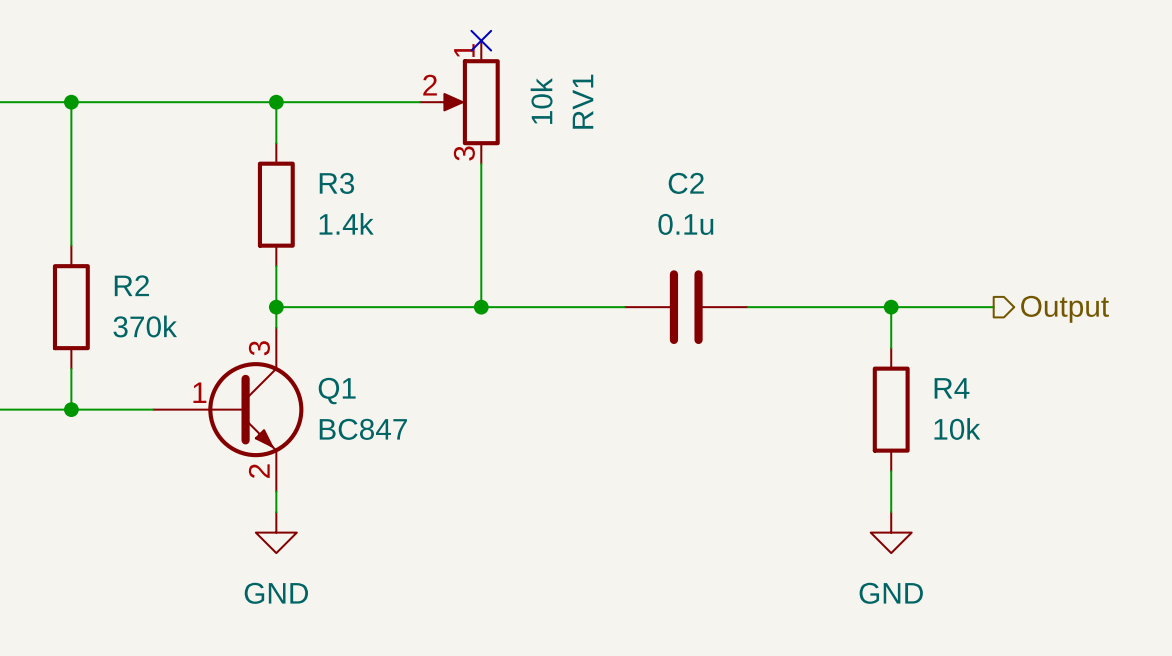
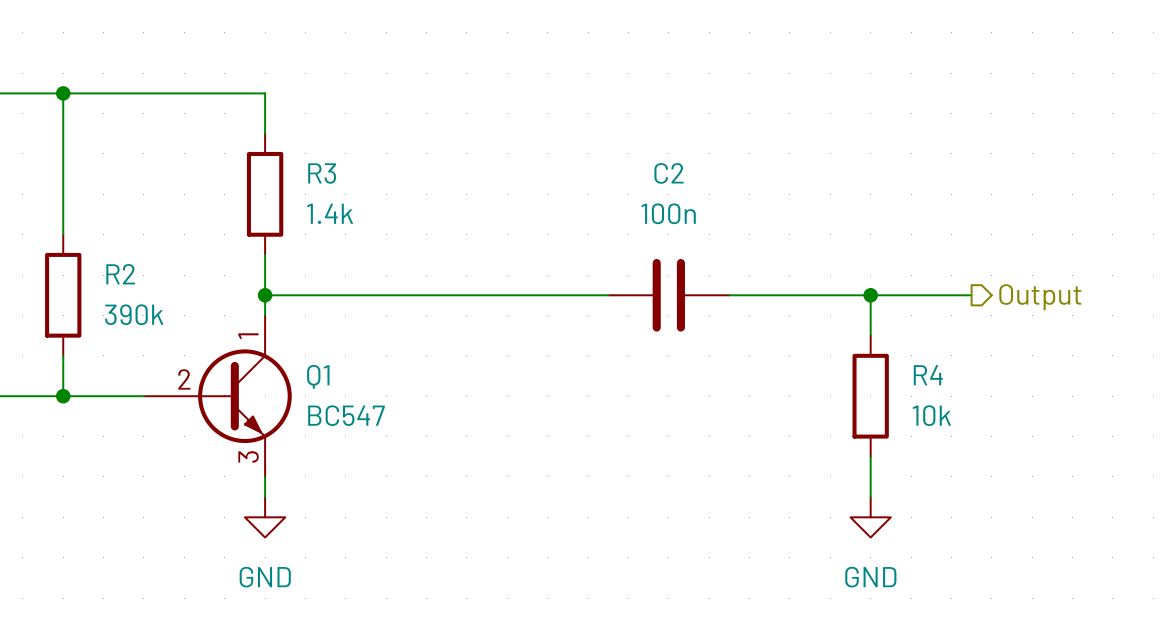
no-connect mark: (481, 40) -> none
wire: (276, 102) (419, 102) -> none
junction: (276, 102) -> none
RV1: 10k (459, 102) -> none
wire: (481, 163) (481, 307) -> none
C2 value: 0.1u (685, 224) -> 100n (668, 213)
junction: (481, 307) -> none
R2 value: 370k (145, 326) -> 390k (134, 314)
Q1 symbol: [153, 327, 304, 492] -> [143, 315, 292, 477]
Q1 value: BC847 (363, 429) -> BC547 (346, 415)

